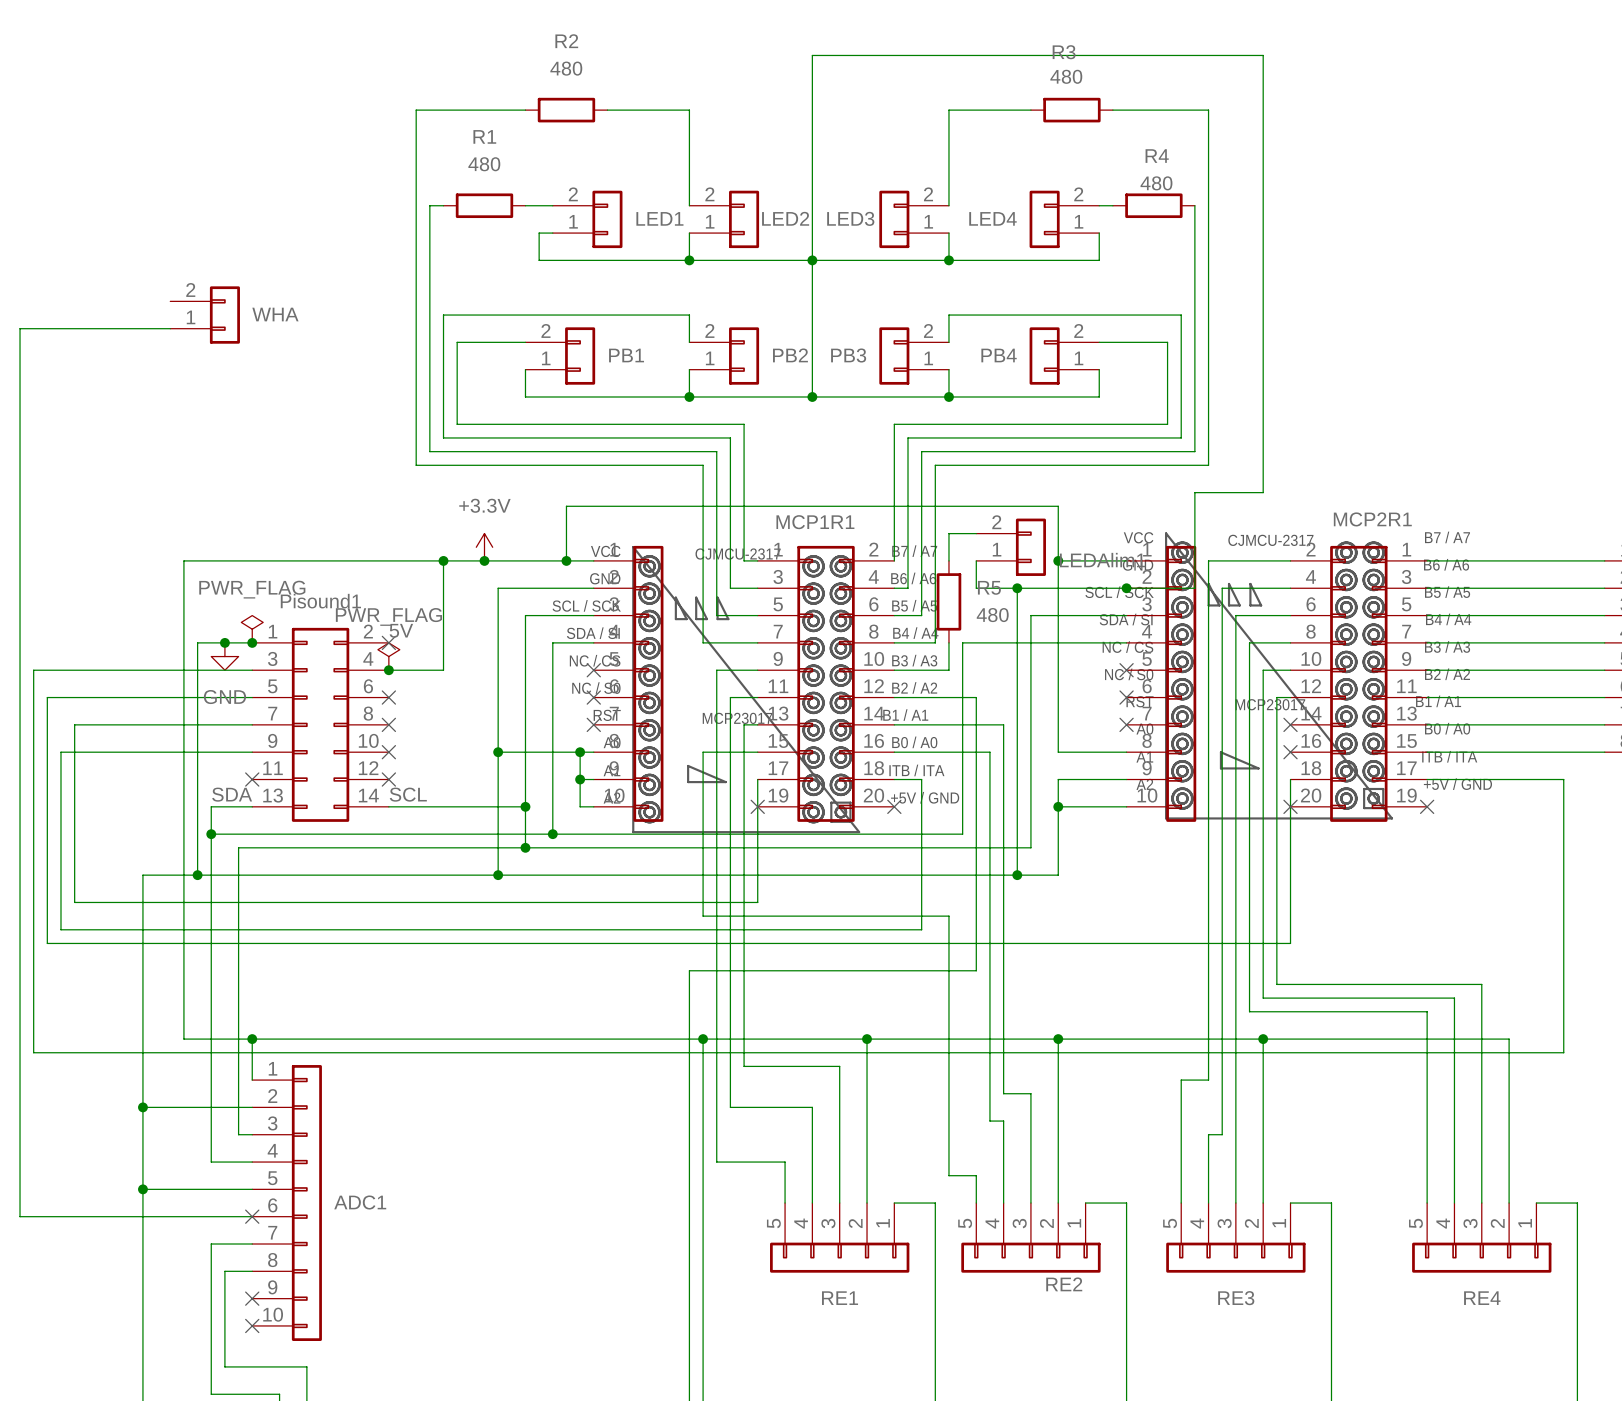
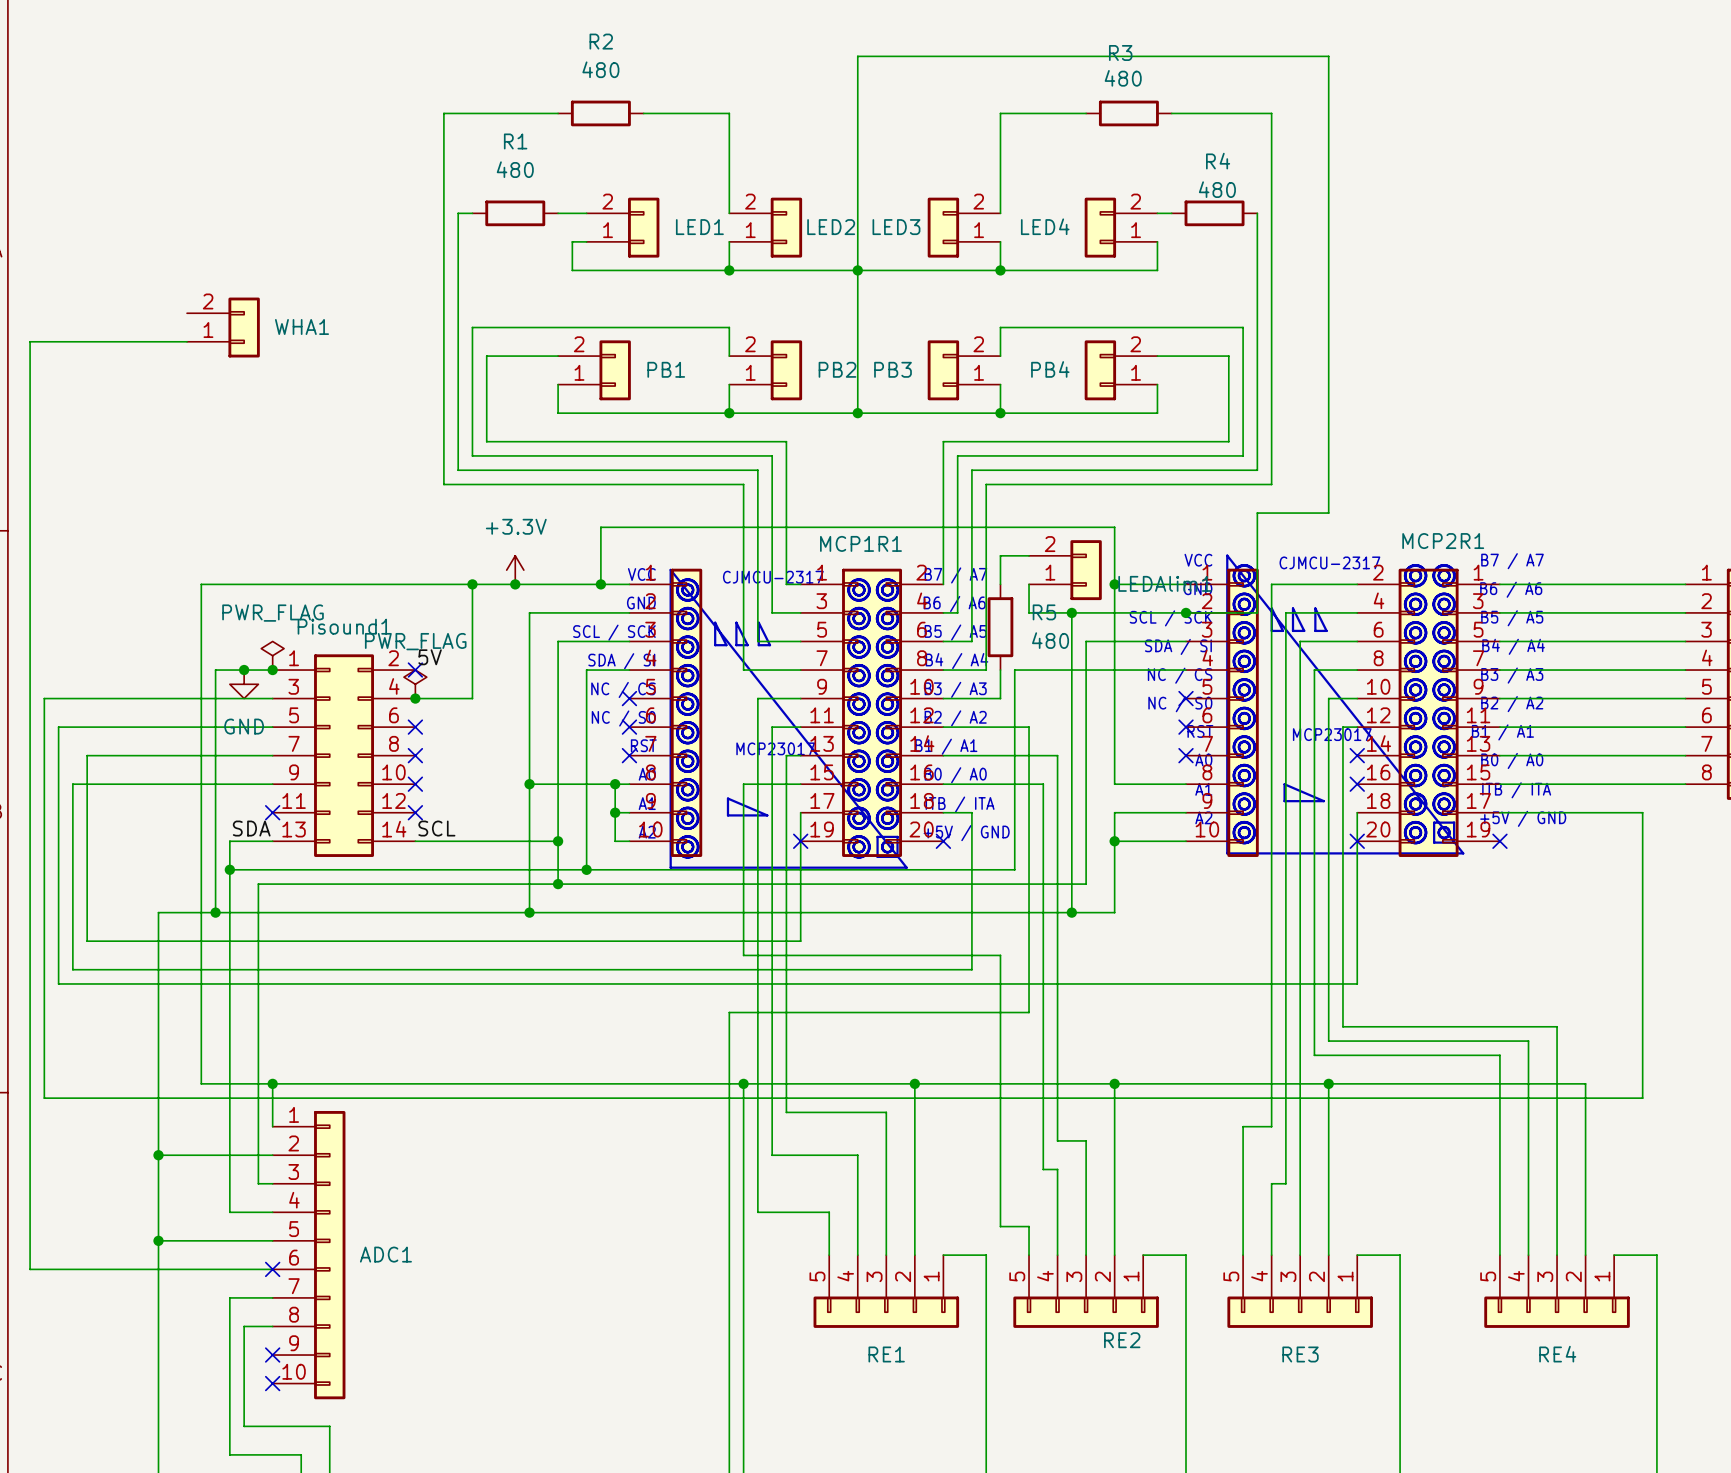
WHA name: WHA (275, 314) -> WHA1 (301, 326)

